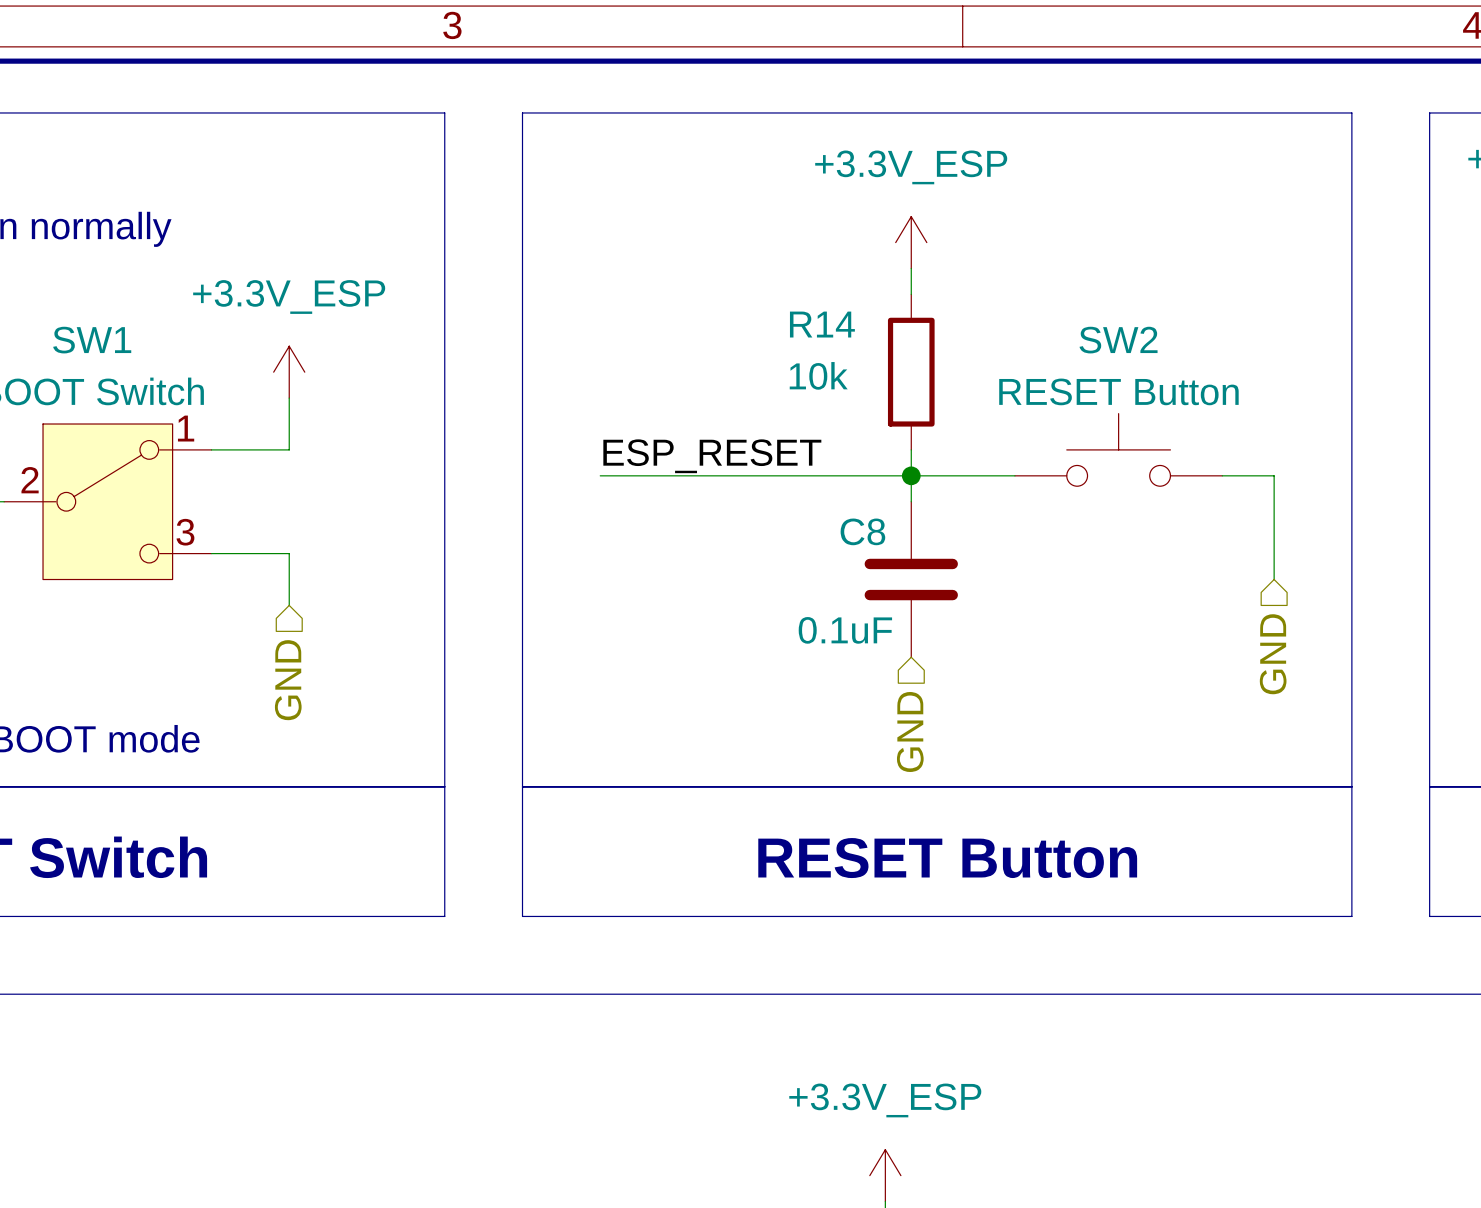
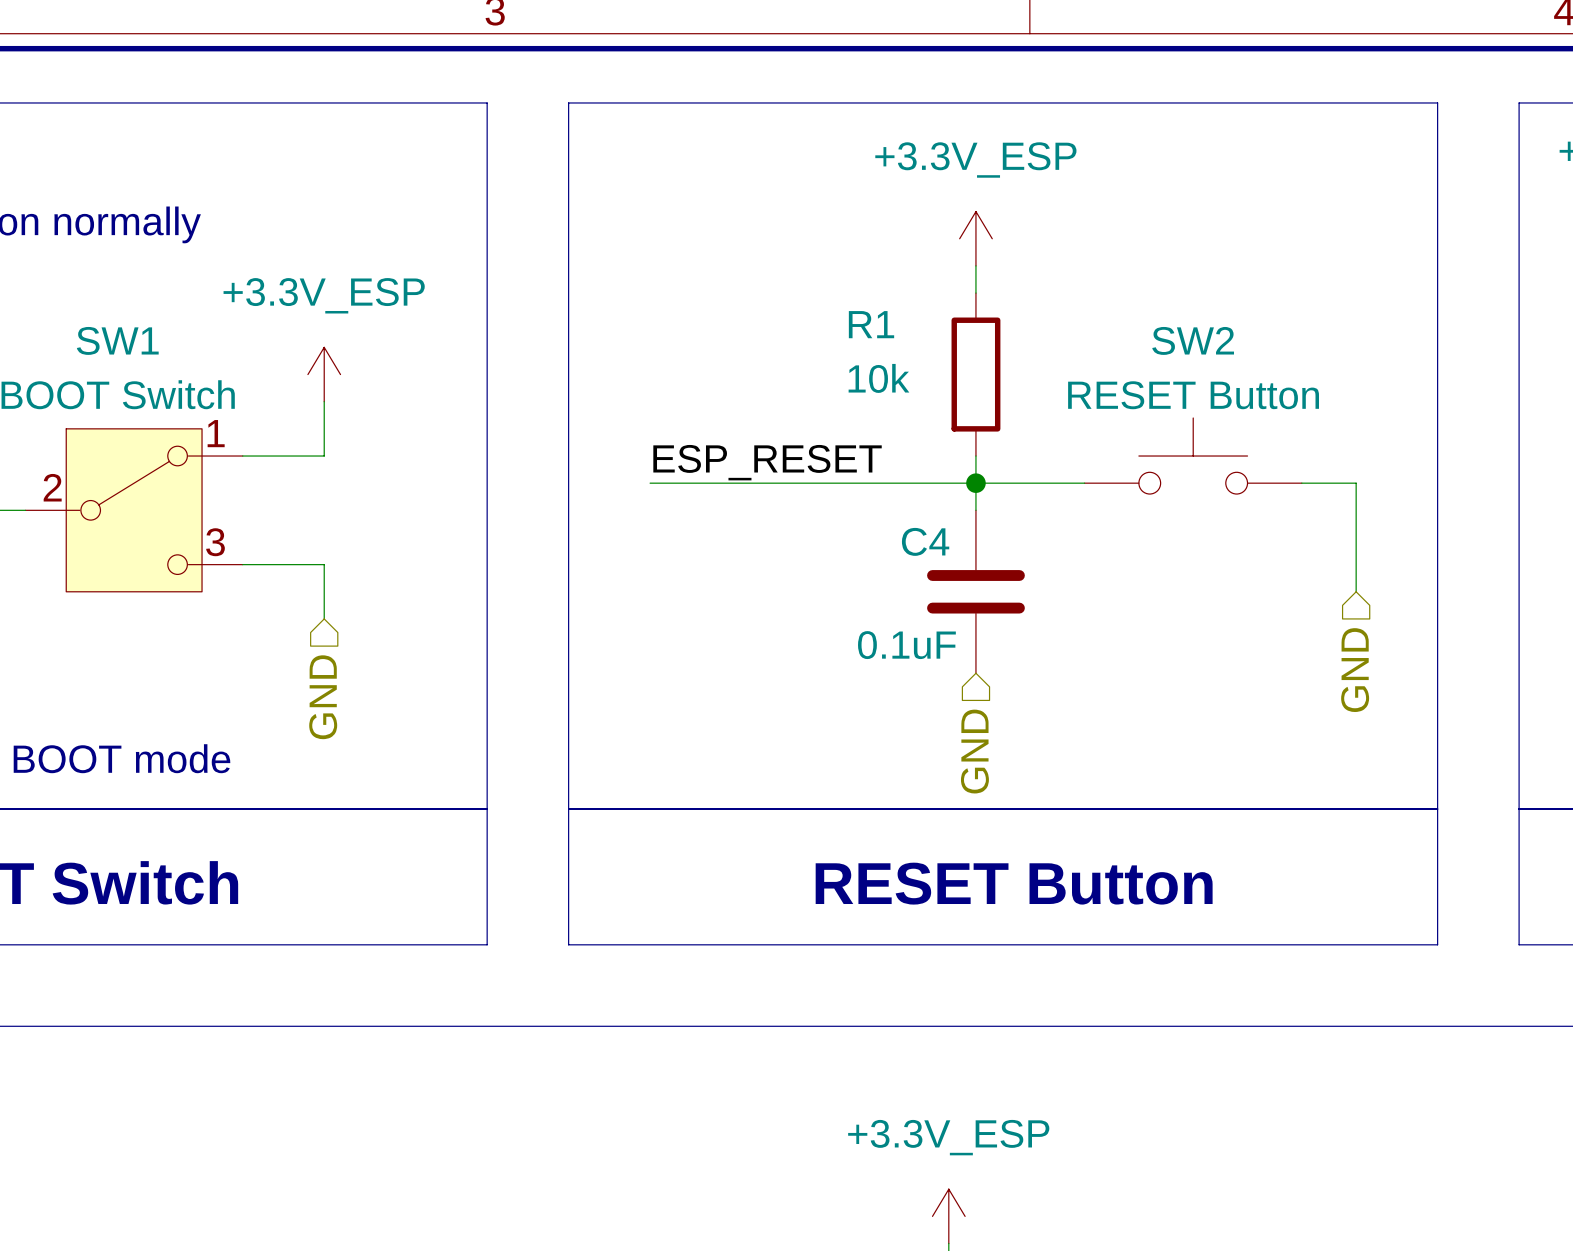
R14 name: R14 (822, 324) -> R1 (871, 324)
C8 name: C8 (862, 531) -> C4 (925, 541)

